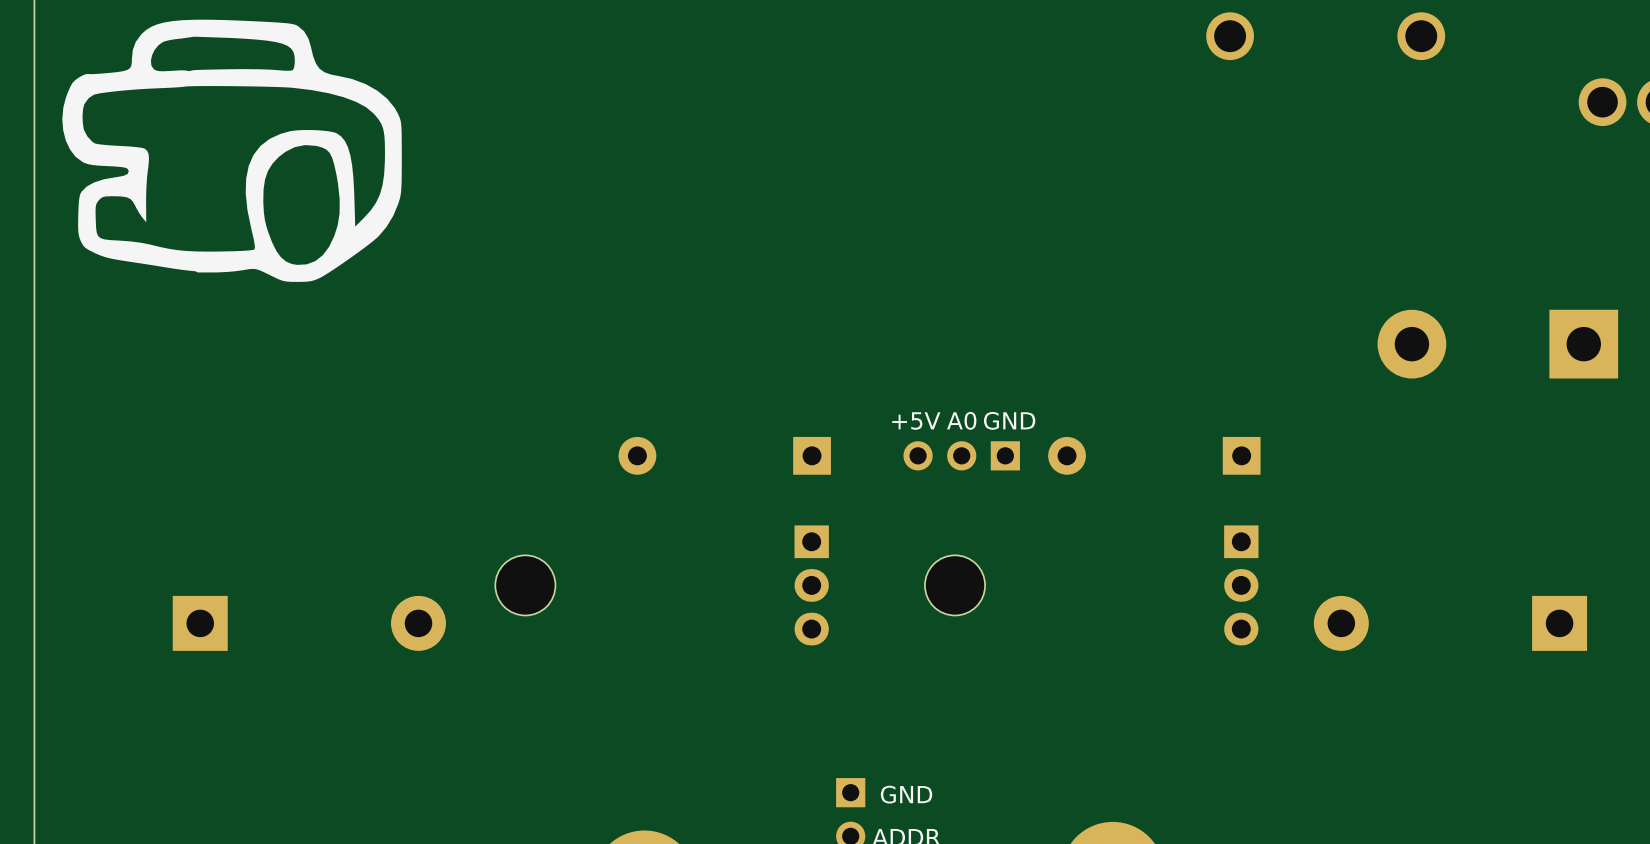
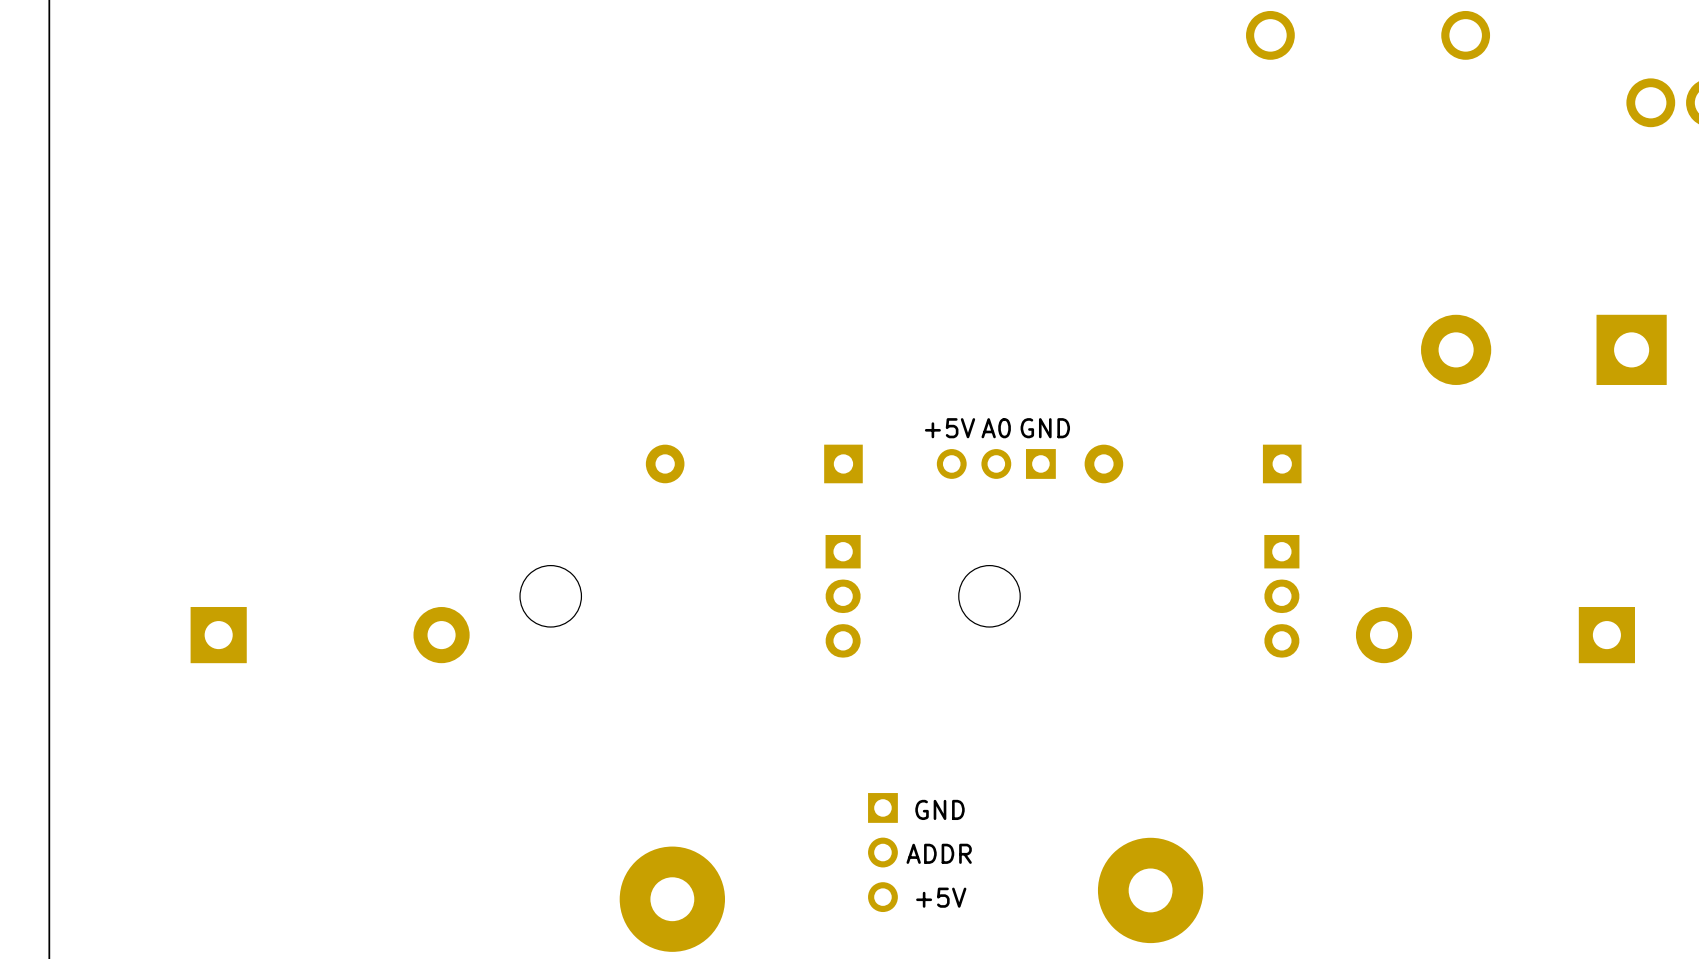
drawing: [62, 19, 402, 282] -> none

